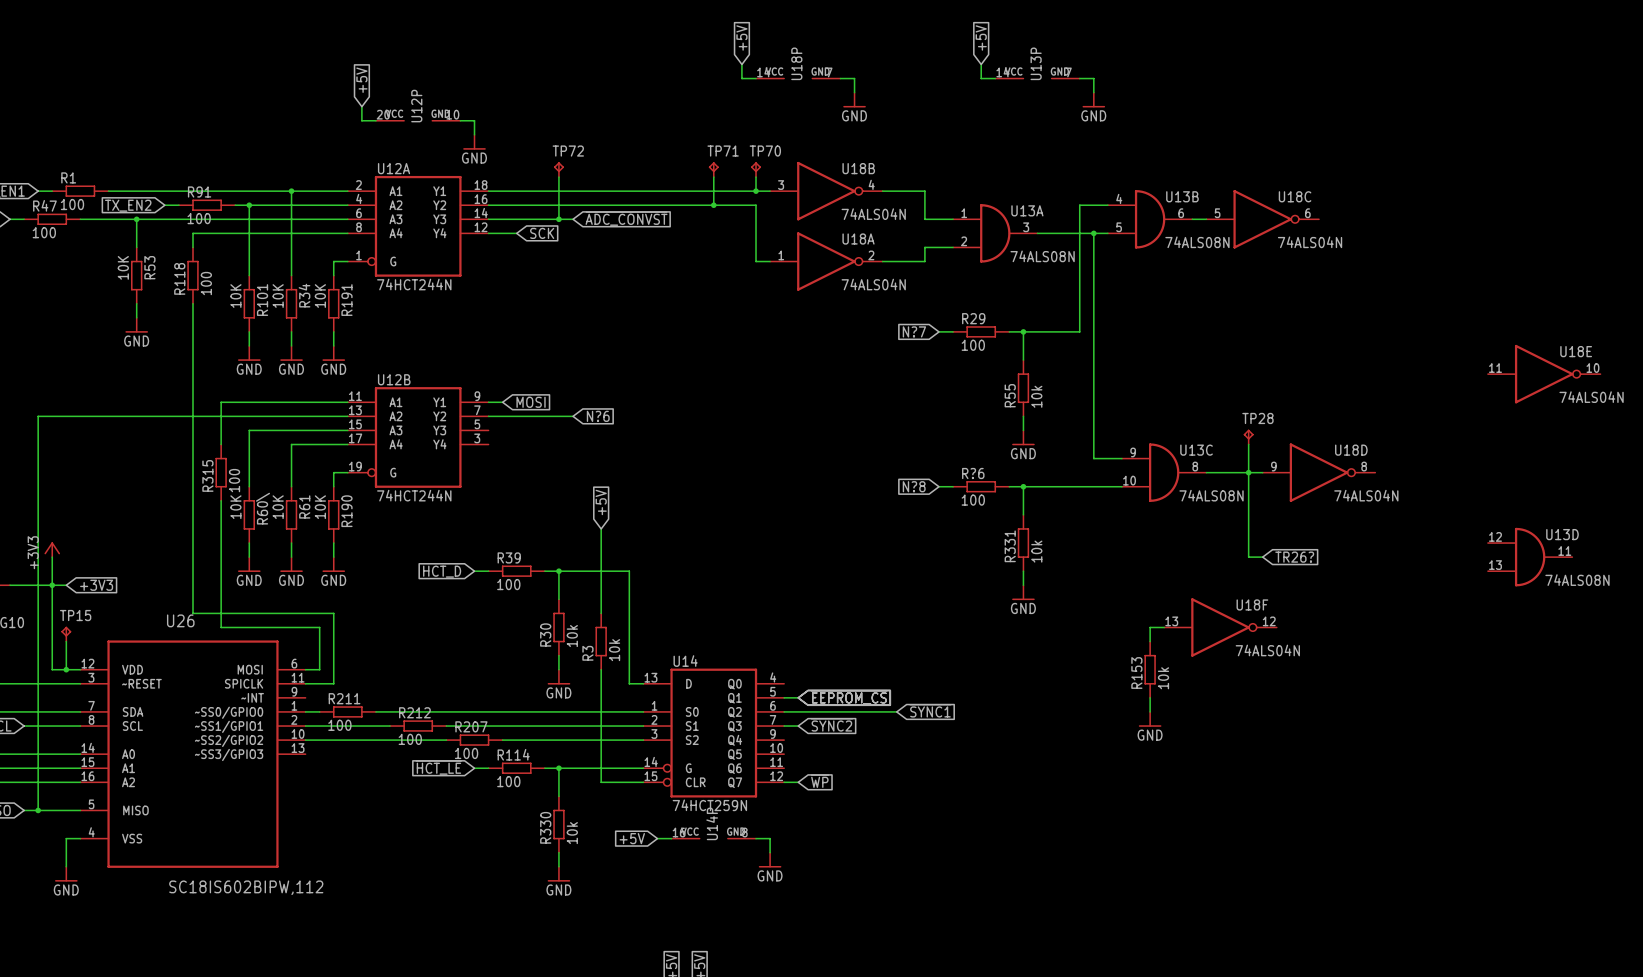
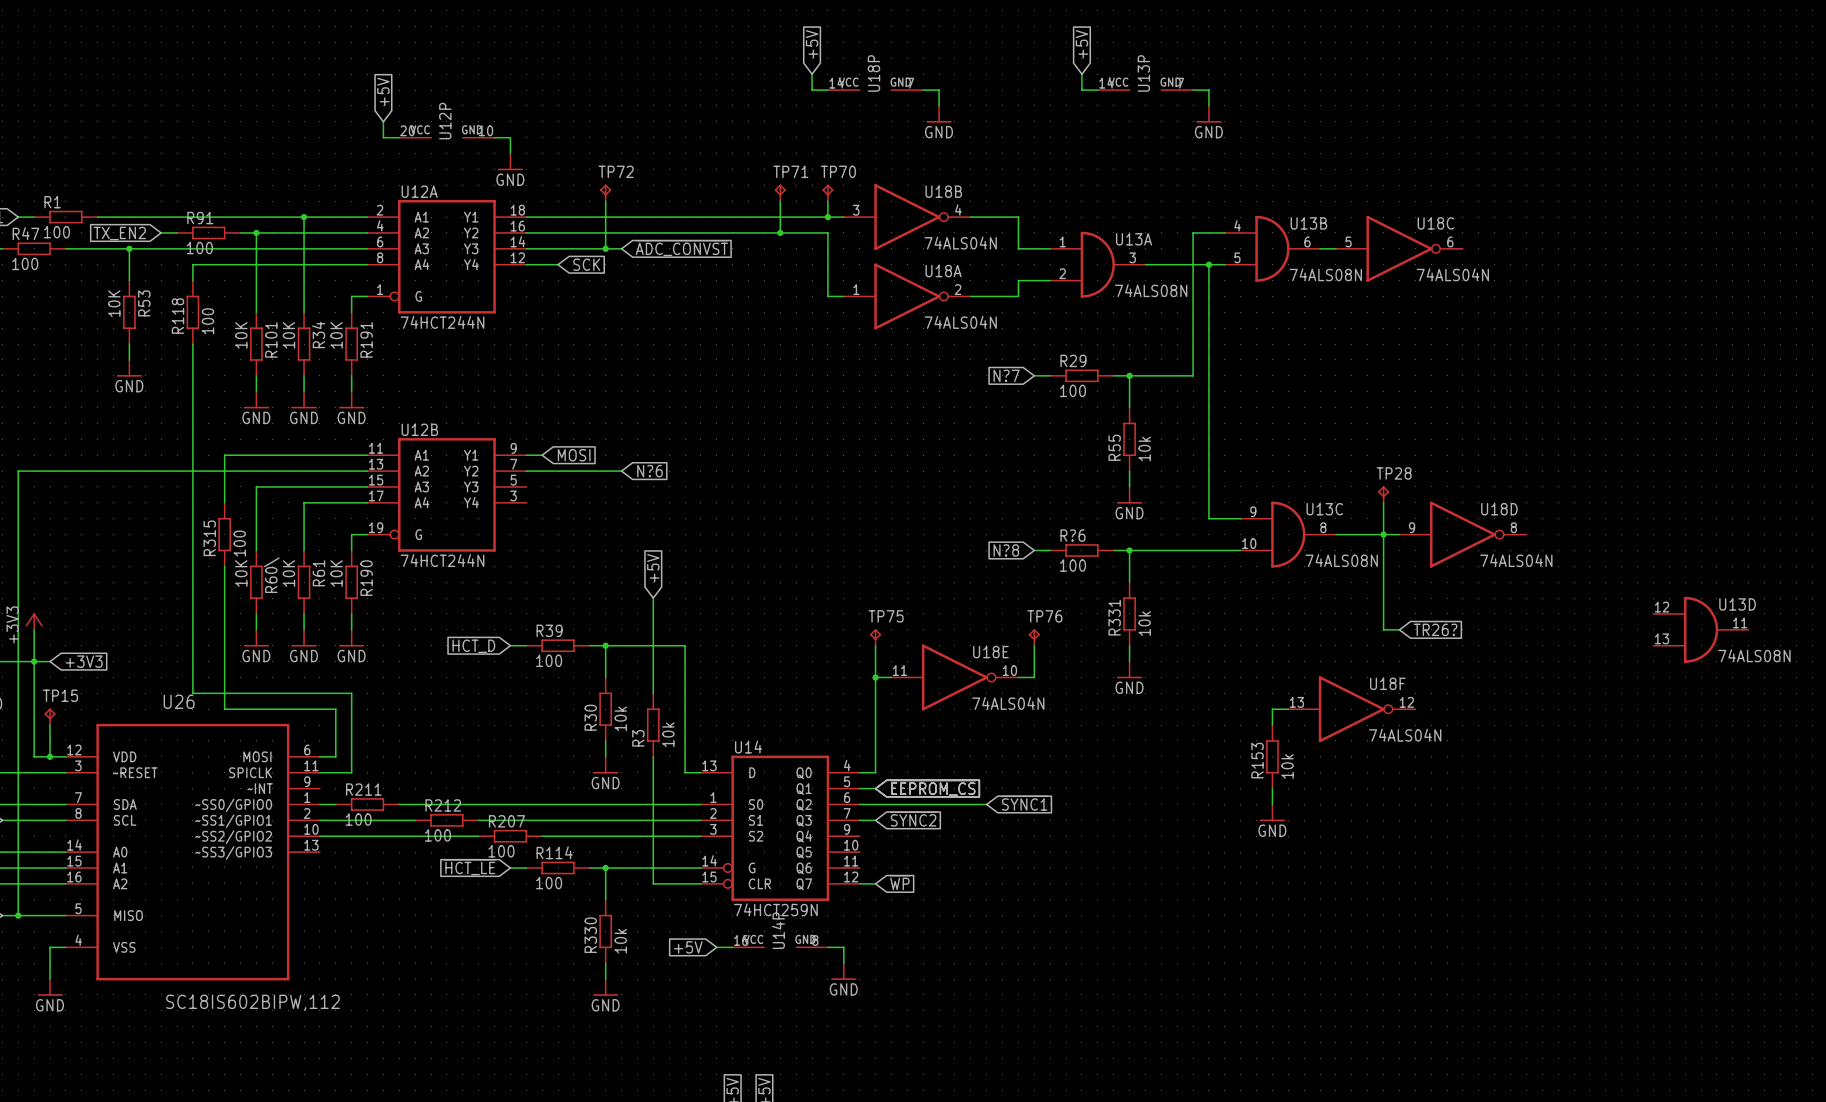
U18E position: (1544, 374) -> (954, 677)
TP75: none -> (875, 637)
TP76: none -> (1034, 637)
wire: none -> (875, 645) (875, 772) (859, 772)
wire: none -> (1034, 645) (1034, 677) (1018, 677)
wire: none -> (875, 677) (891, 677)
junction: none -> (875, 677)

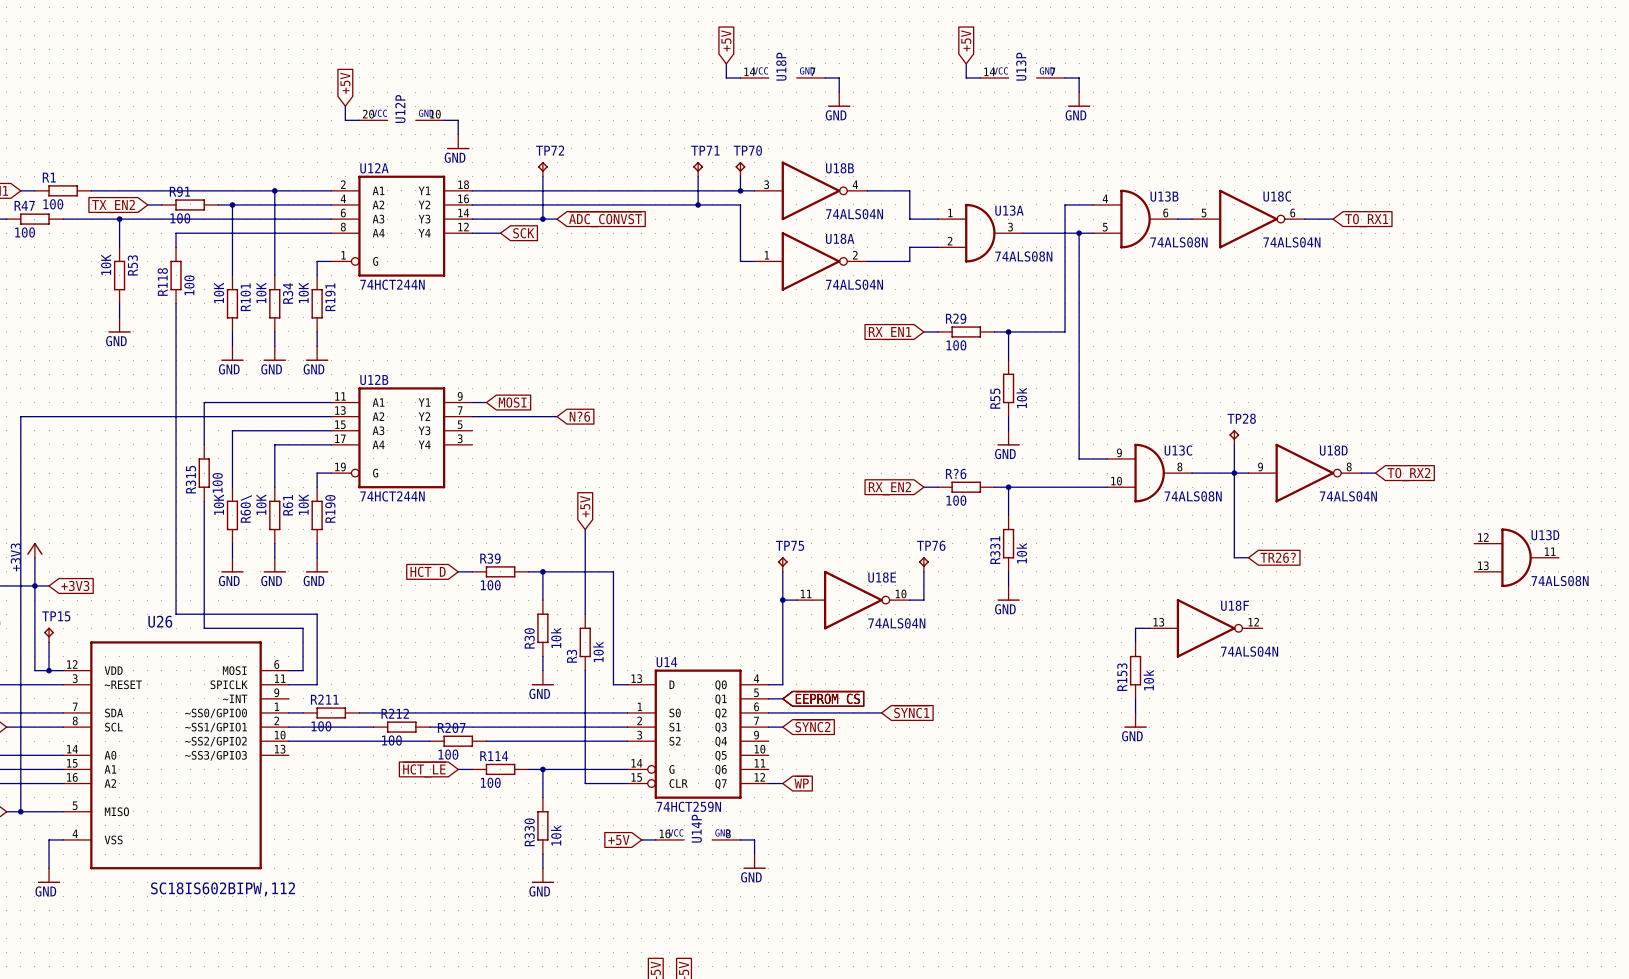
wire: none -> (1304, 219) (1333, 219)
global label: none -> TO_RX1 (1366, 220)
global label: N?7 (1006, 375) -> RX_EN1 (890, 333)
wire: none -> (1361, 473) (1375, 473)
global label: none -> TO_RX2 (1408, 474)
global label: N?8 (1006, 550) -> RX_EN2 (889, 488)

